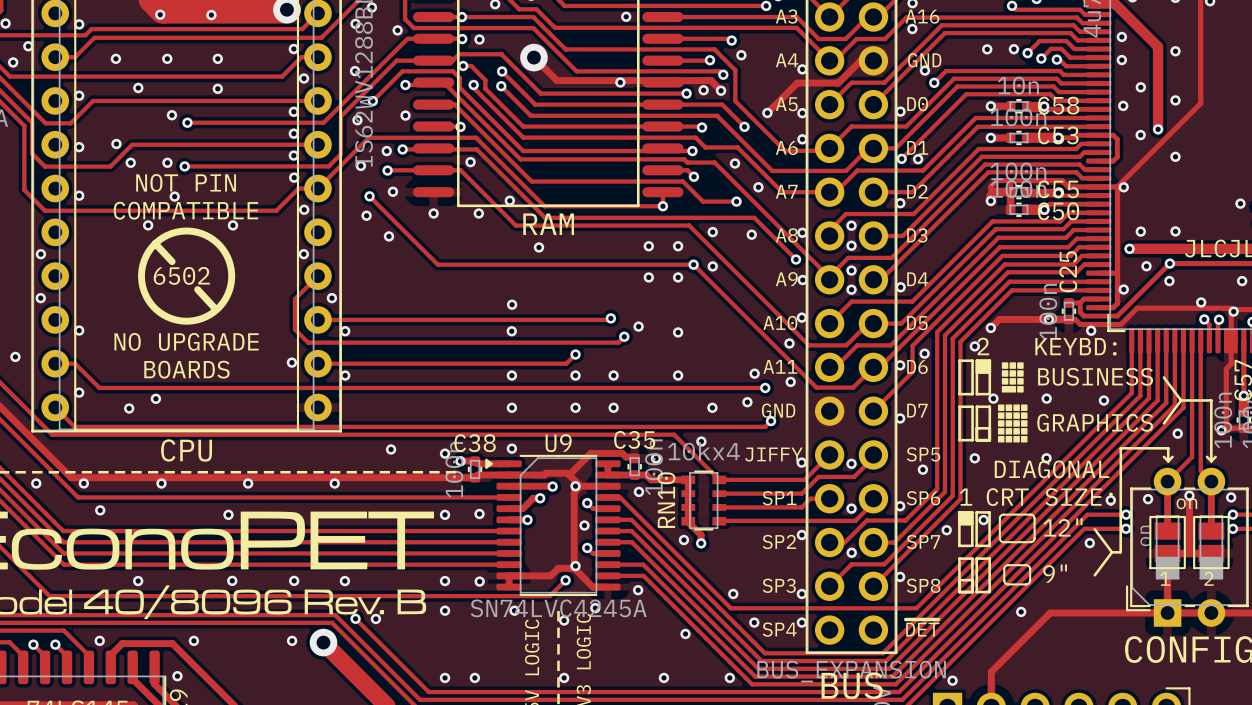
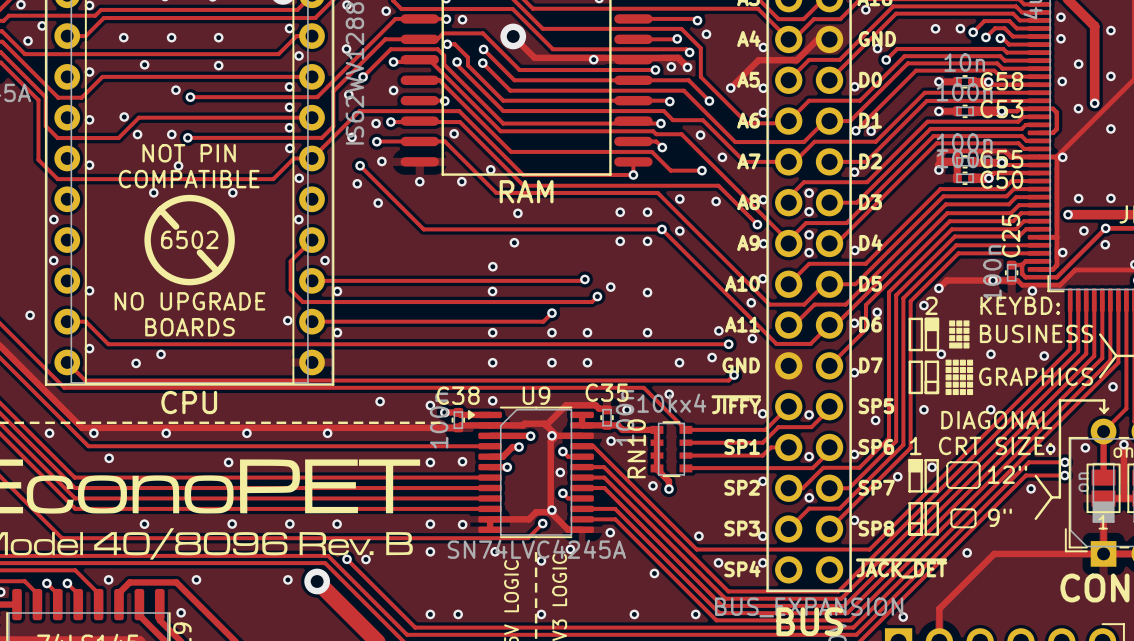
via: none -> (514, 242)
text: JIFFY (773, 454) -> ~{JIFFY} (736, 404)
text: ~{DET} (922, 627) -> ~{JACK_DET} (901, 568)

